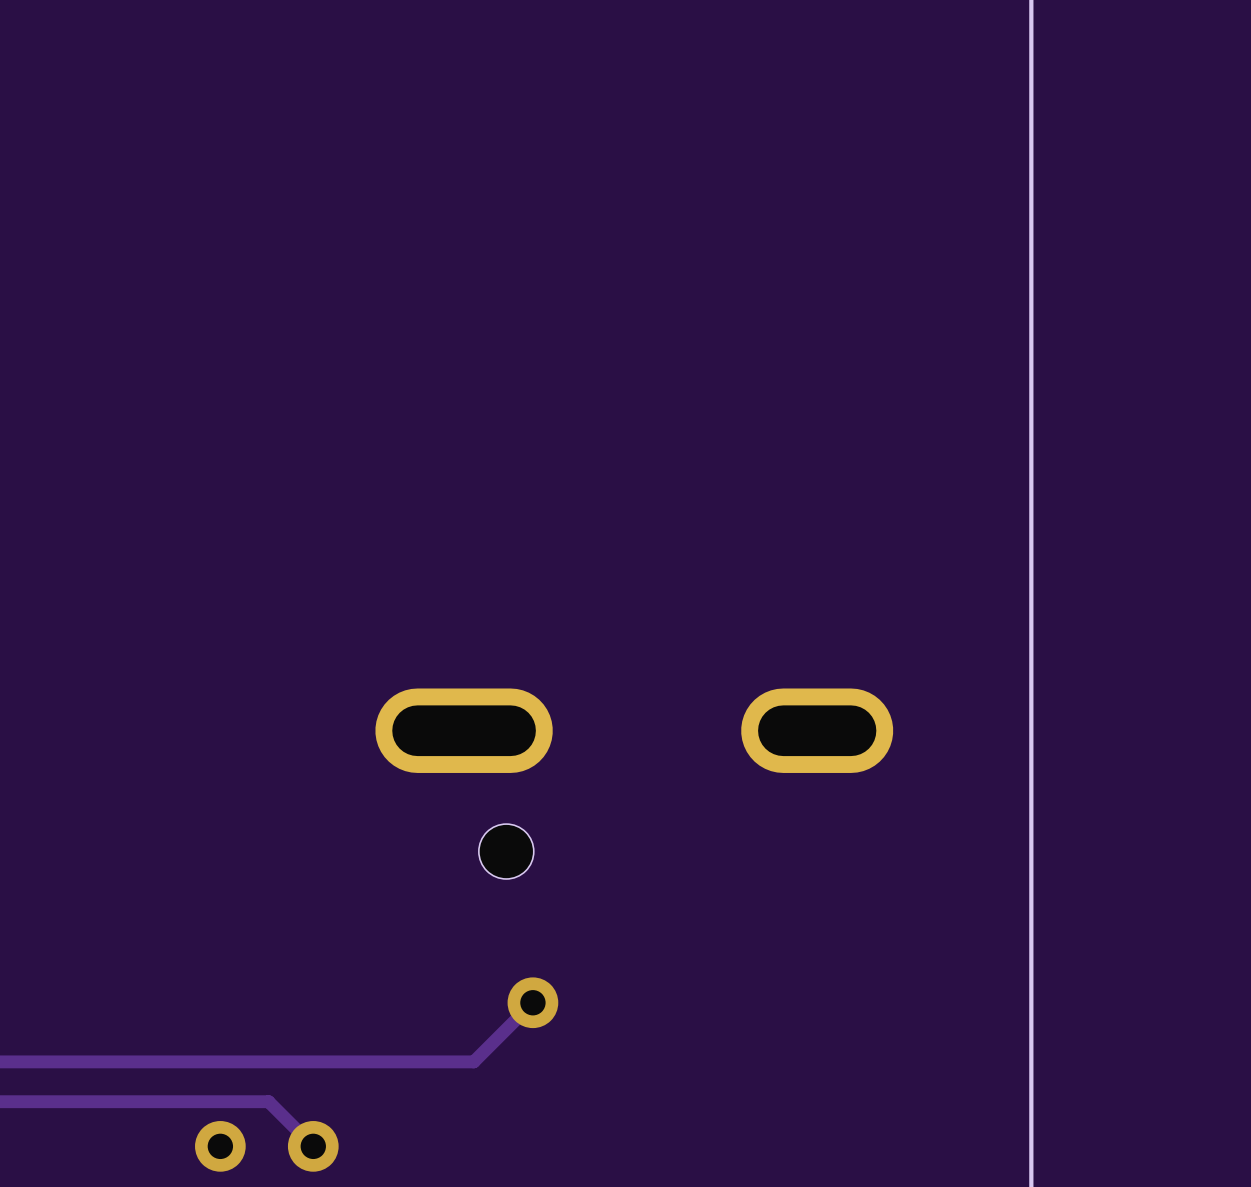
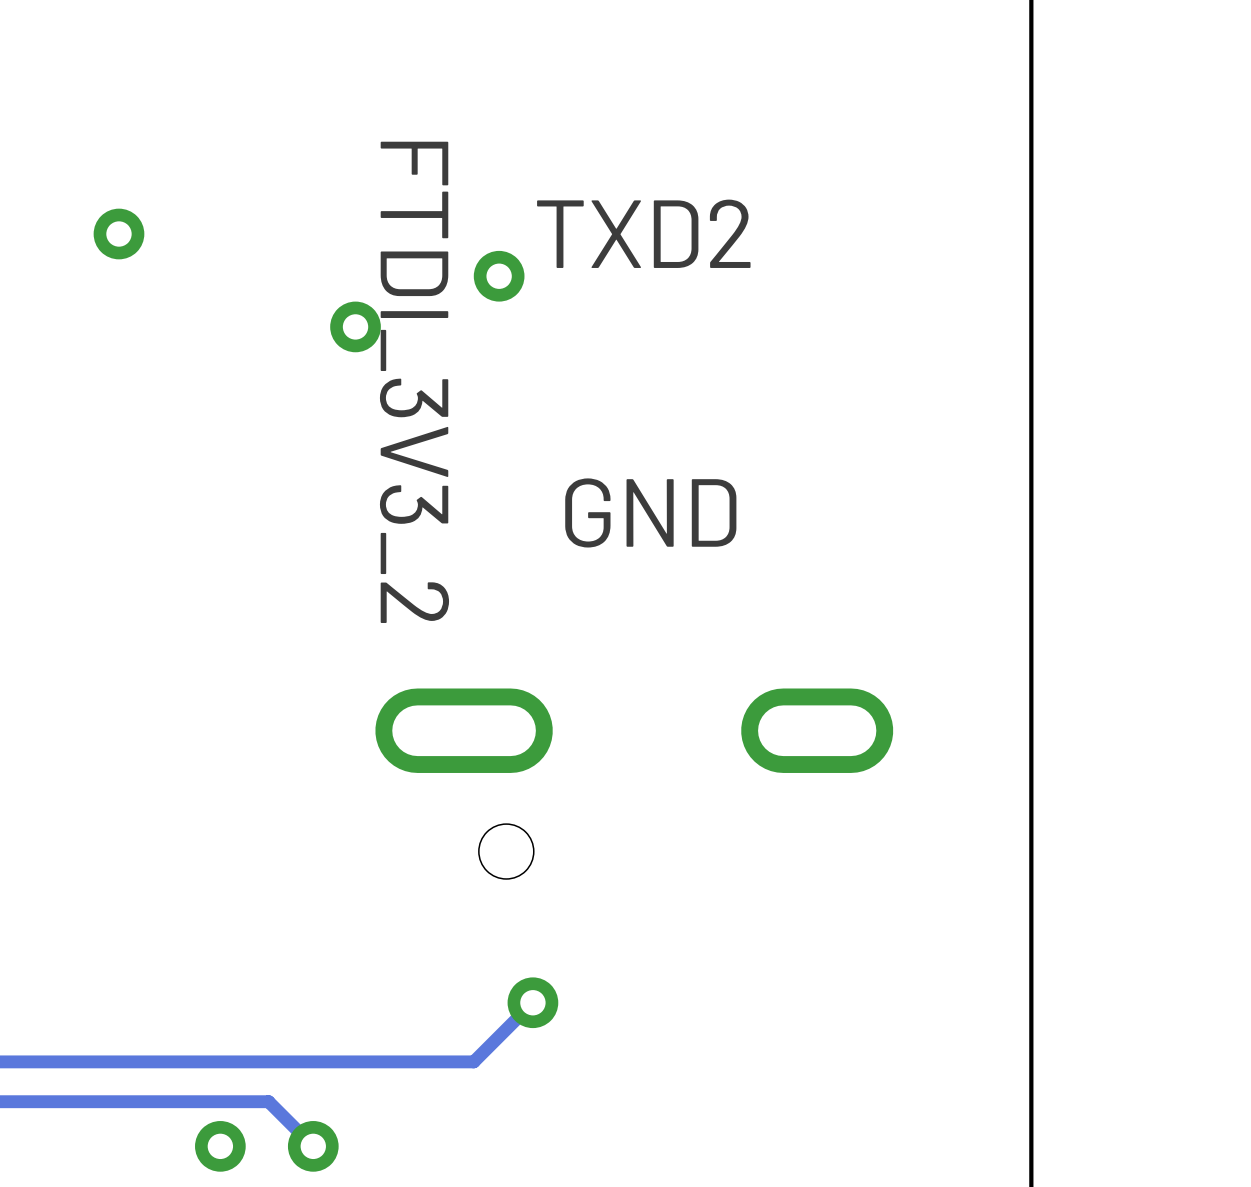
via: none -> (118, 234)
text: none -> TXD2 (643, 233)
via: none -> (499, 276)
via: none -> (355, 326)
text: none -> FTDI_3V3_2 (414, 382)
text: none -> GND (650, 512)

